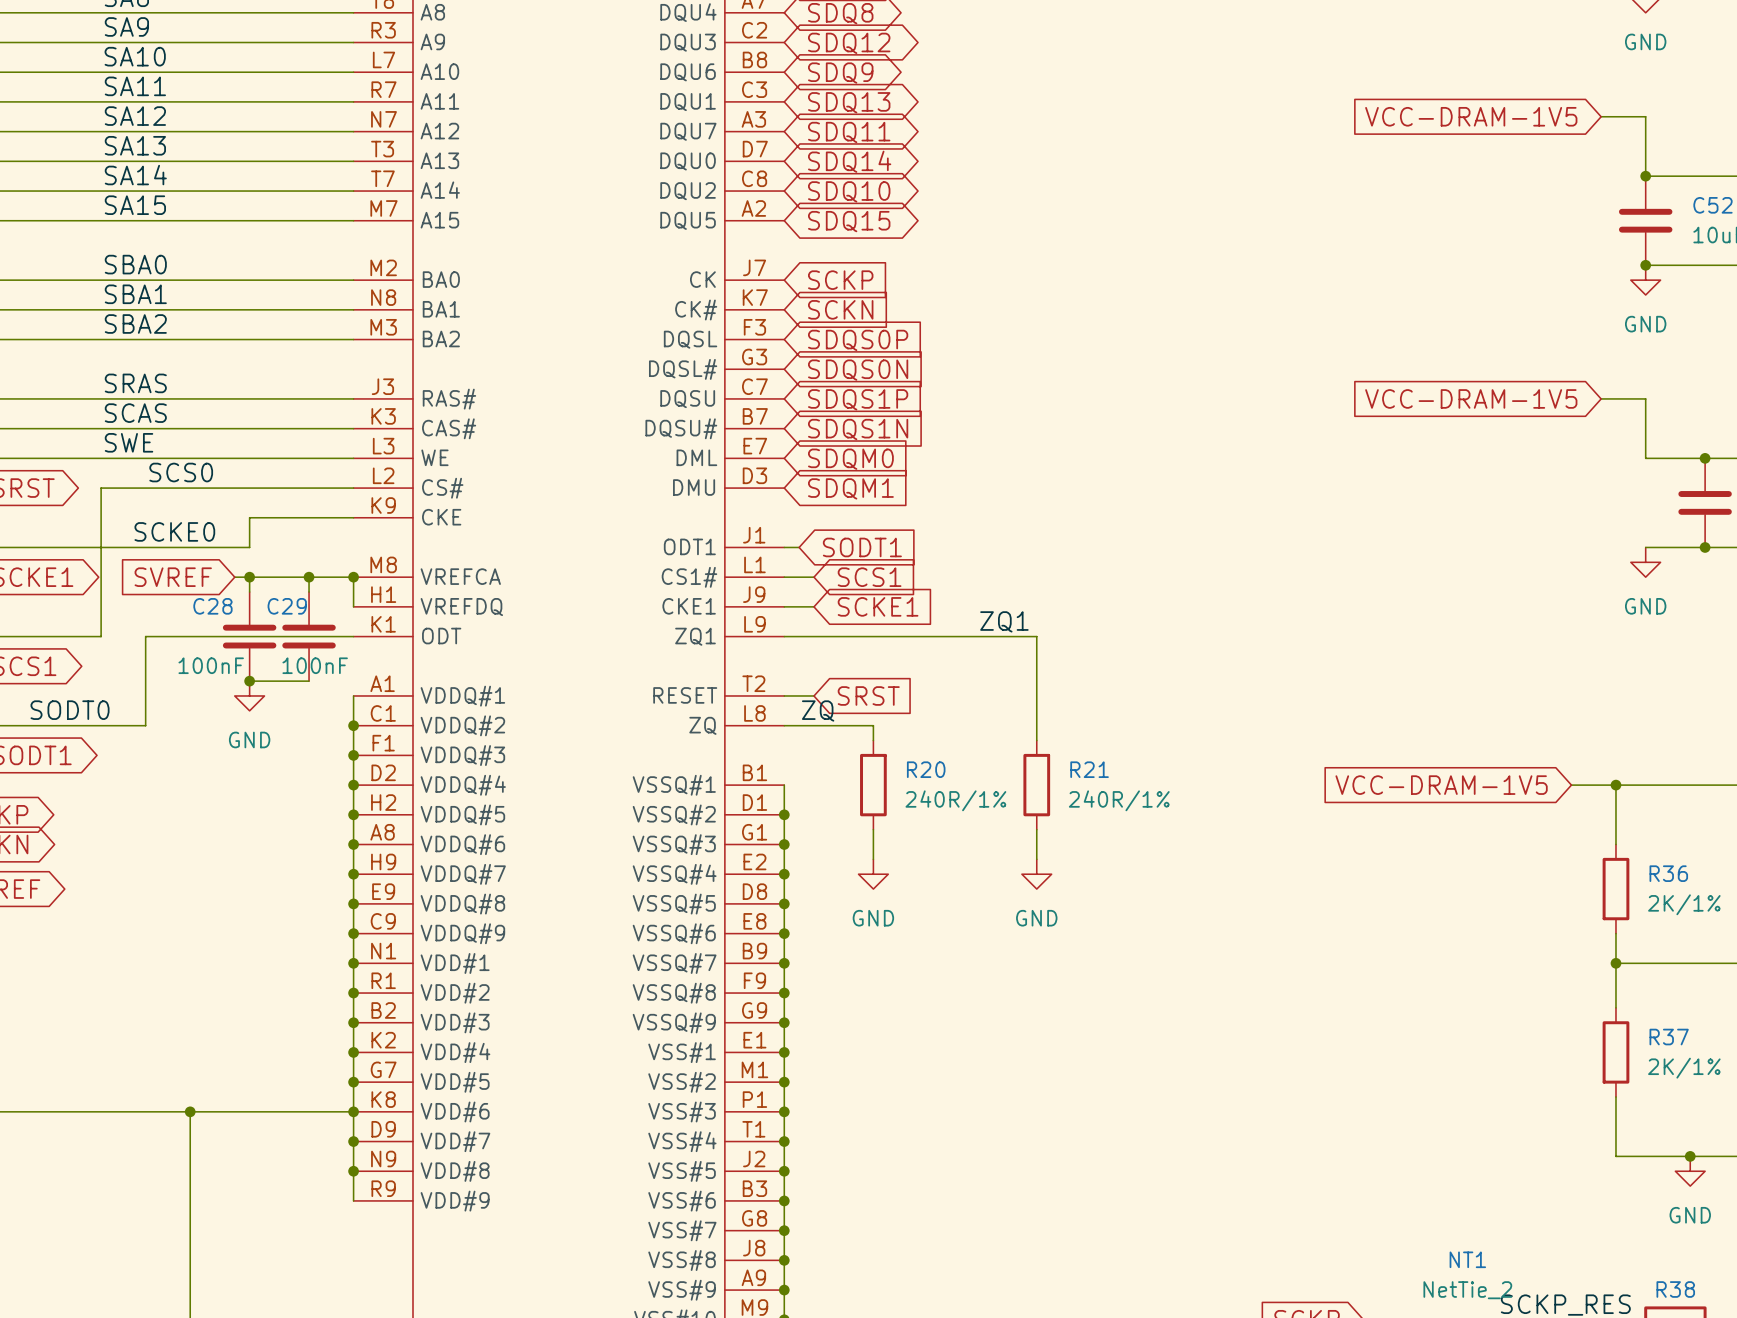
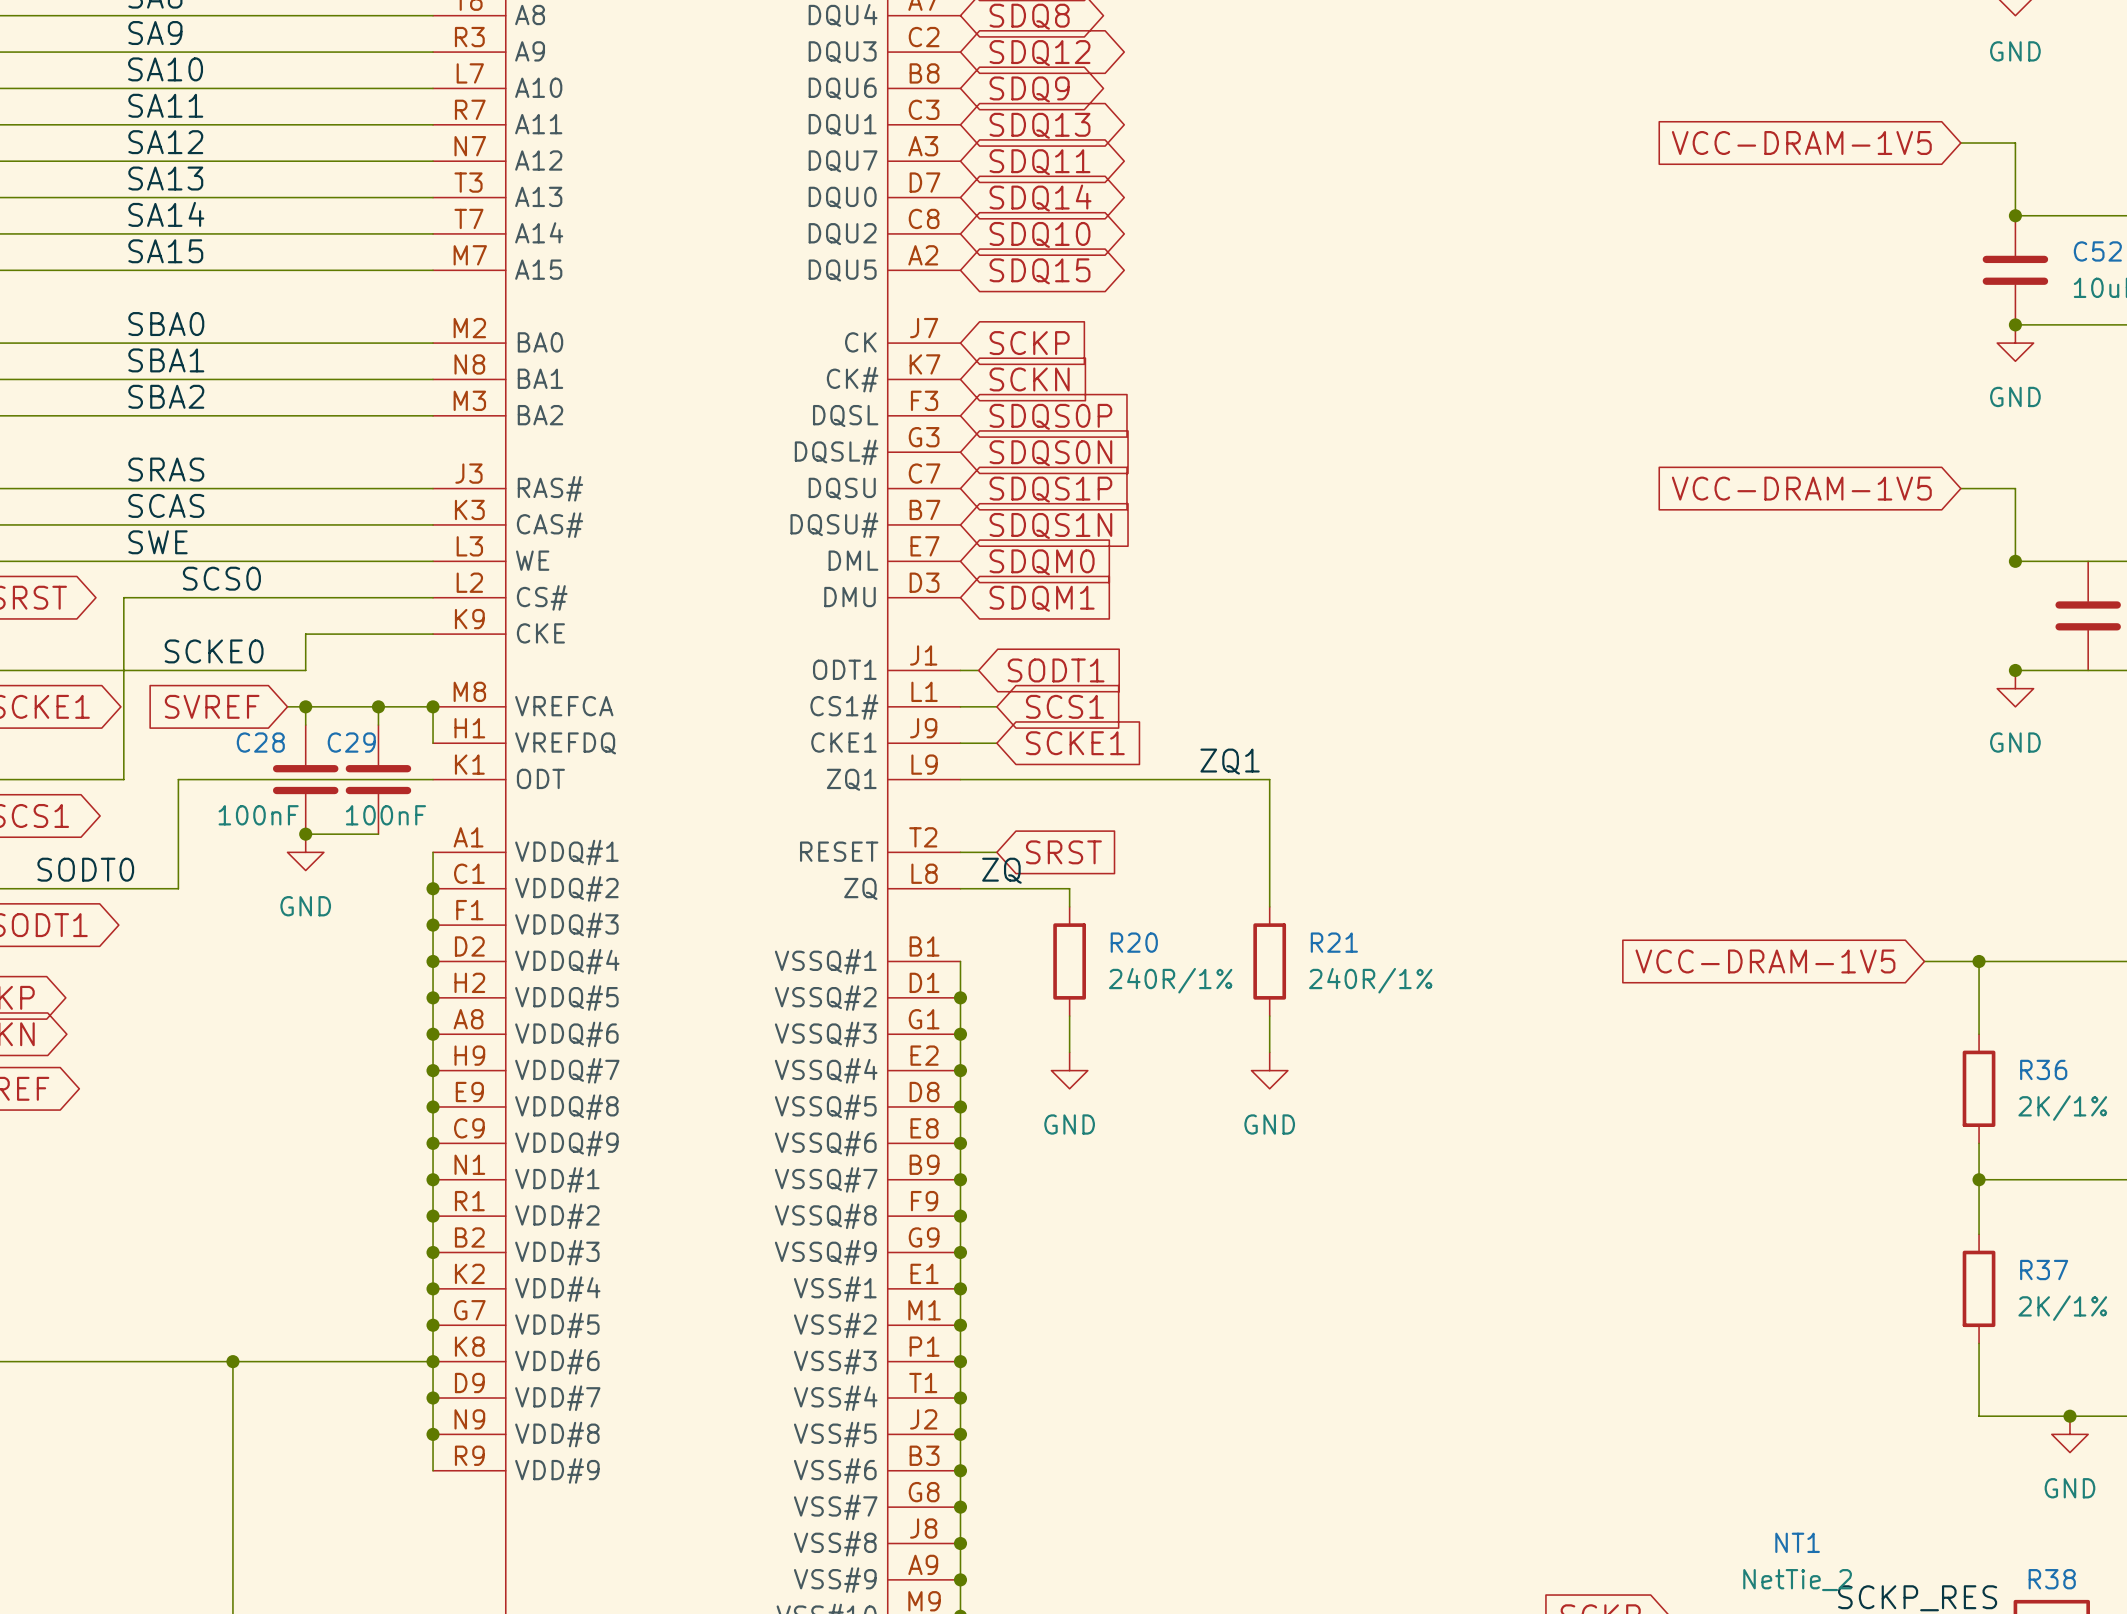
junction: none -> (2015, 561)
junction: (1705, 458) -> none
junction: none -> (2015, 670)
junction: (1705, 547) -> none

